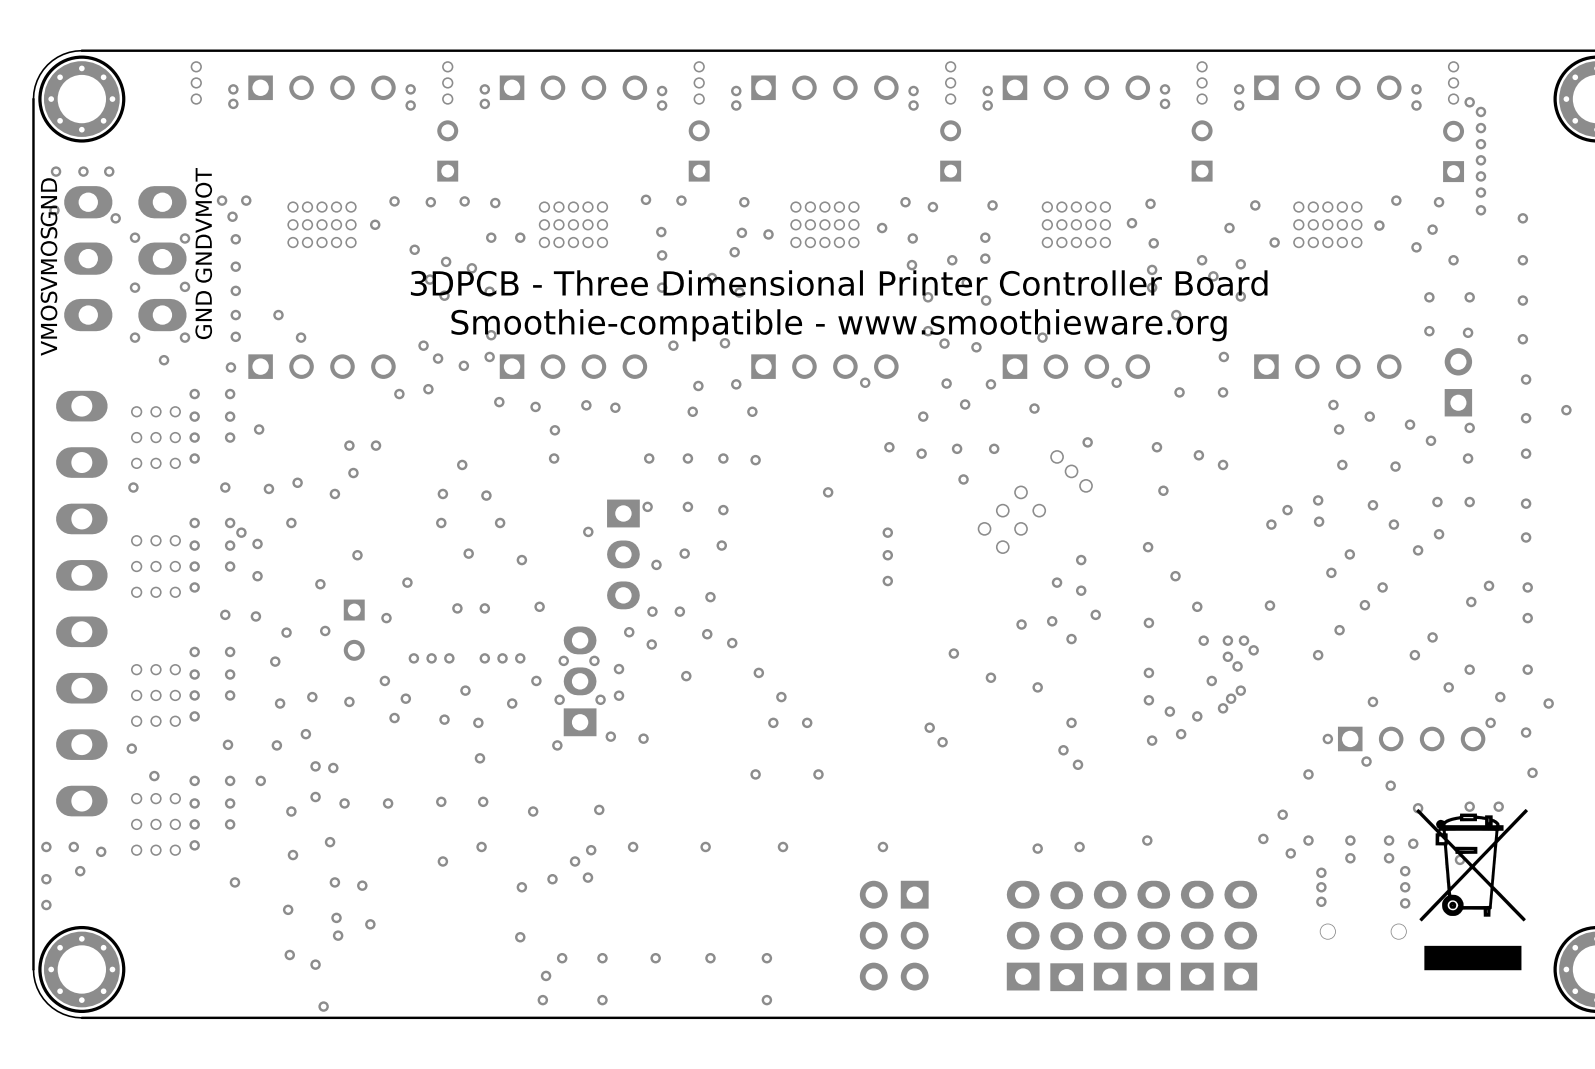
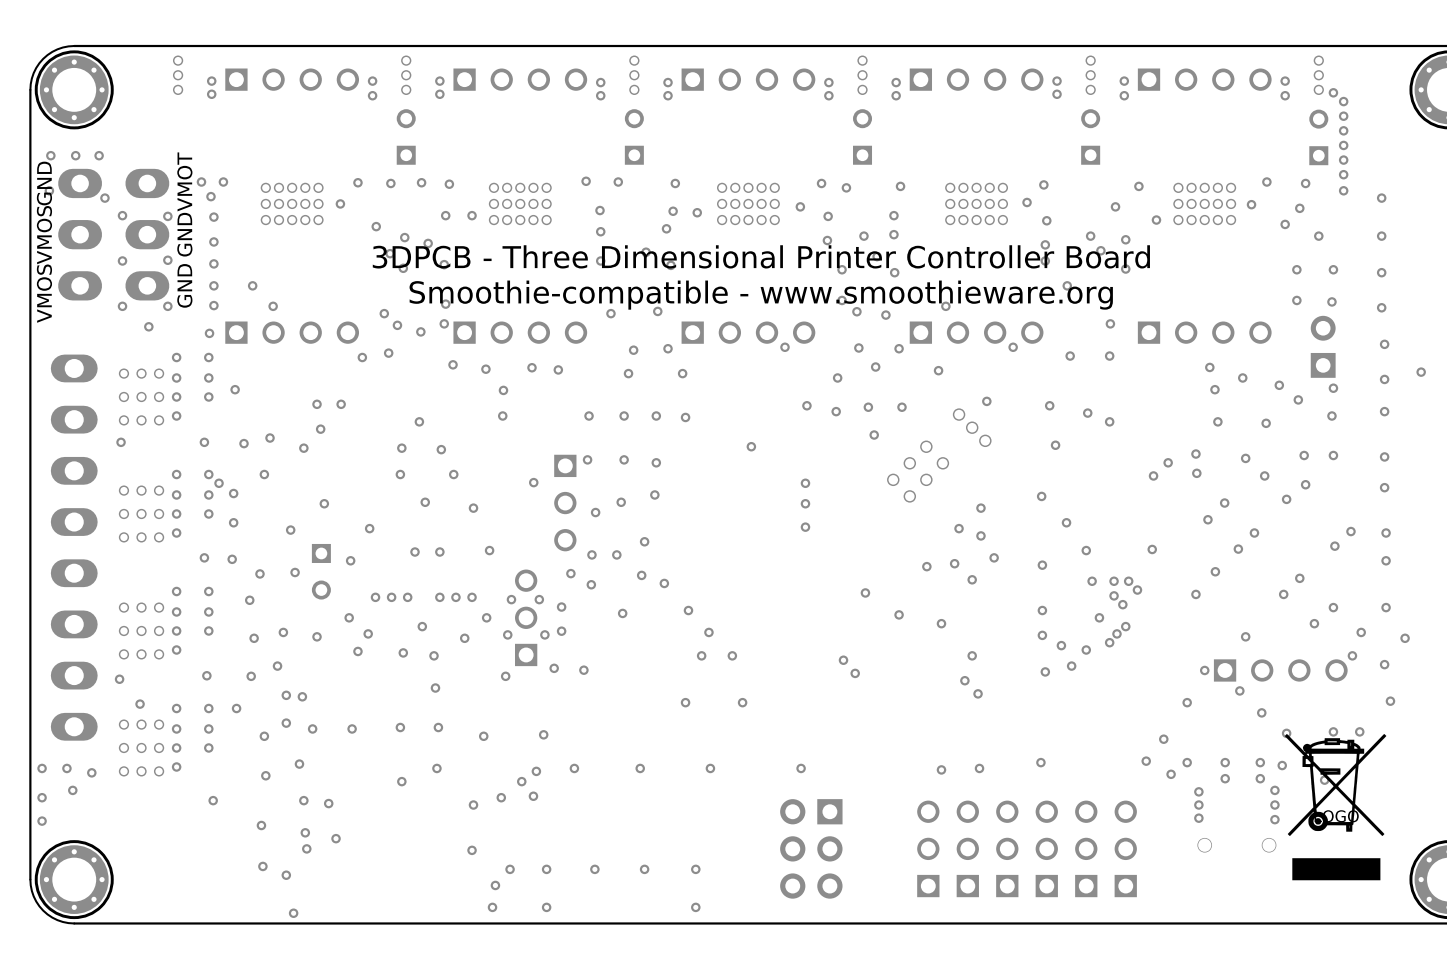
part footprint: [607, 499, 640, 610] -> [554, 454, 577, 552]
part footprint: [563, 626, 597, 737] -> [515, 569, 538, 667]
drawing shape: [1416, 809, 1529, 971] -> [1284, 734, 1387, 881]
part footprint: [1006, 880, 1040, 991] -> [917, 800, 940, 898]
part footprint: [1093, 880, 1127, 991] -> [996, 800, 1019, 898]
part footprint: [1137, 880, 1171, 991] -> [1035, 800, 1058, 898]
part footprint: [1180, 880, 1214, 991] -> [1075, 800, 1098, 898]
part footprint: [1224, 880, 1258, 991] -> [1114, 800, 1137, 898]
part footprint: [1050, 881, 1084, 992] -> [956, 800, 979, 898]

